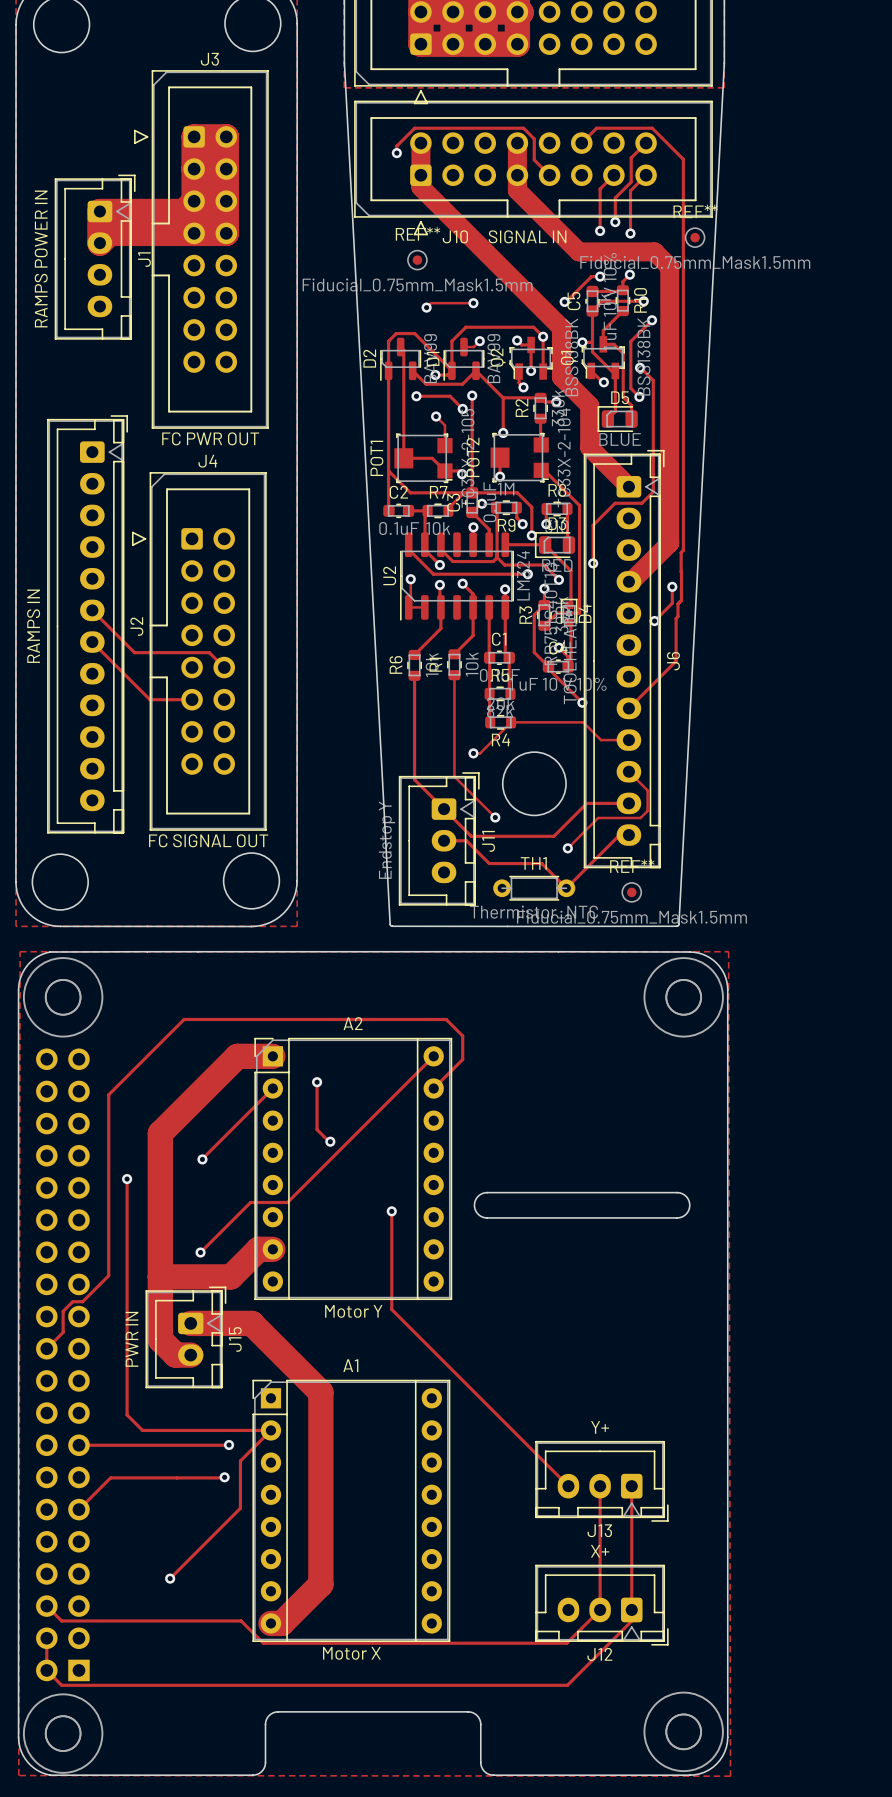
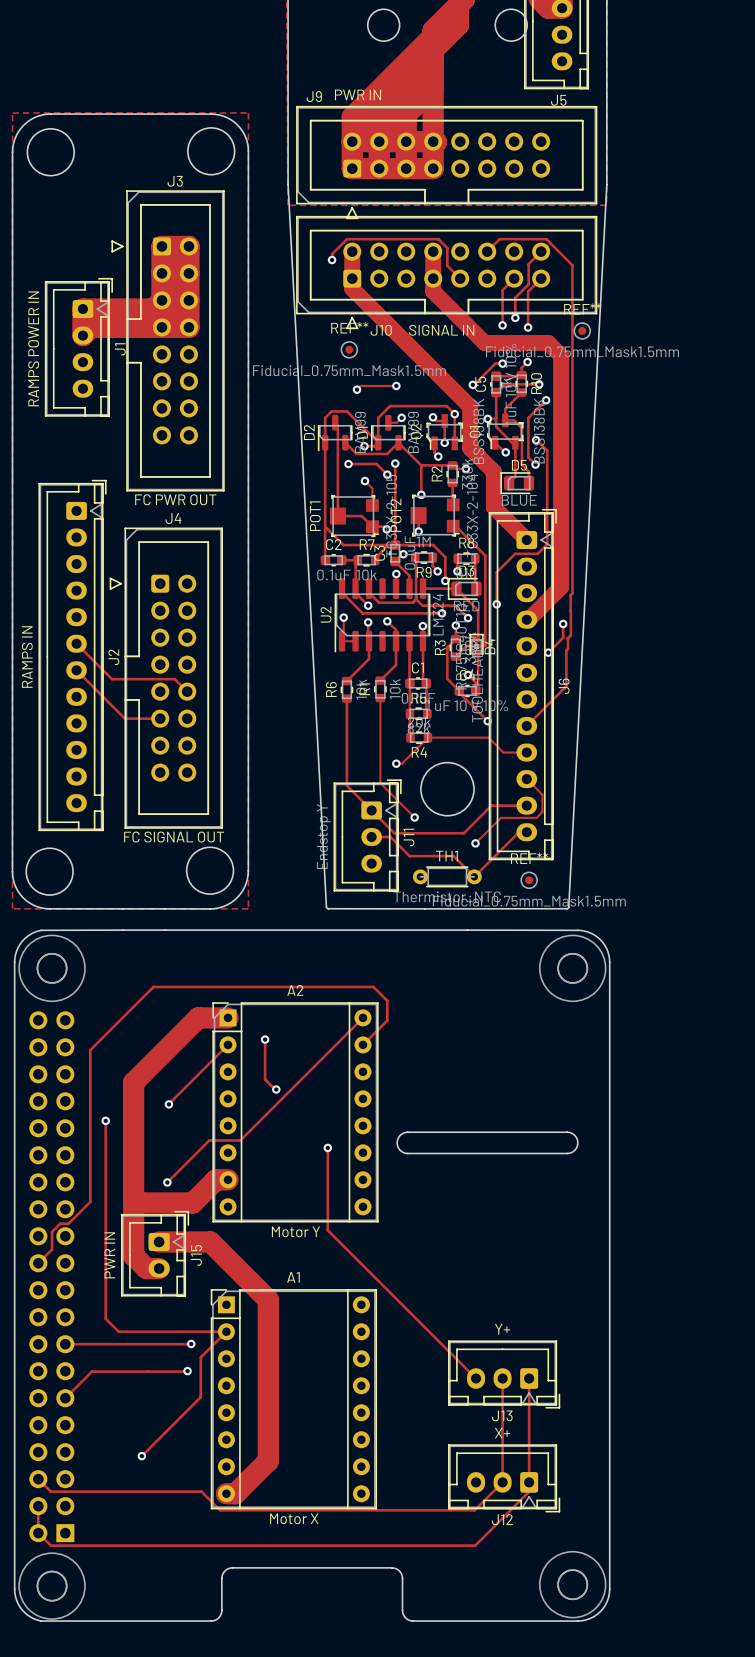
zone outline: (20, 951) (18, 1775) (730, 1776) (728, 951) (20, 951) -> none

